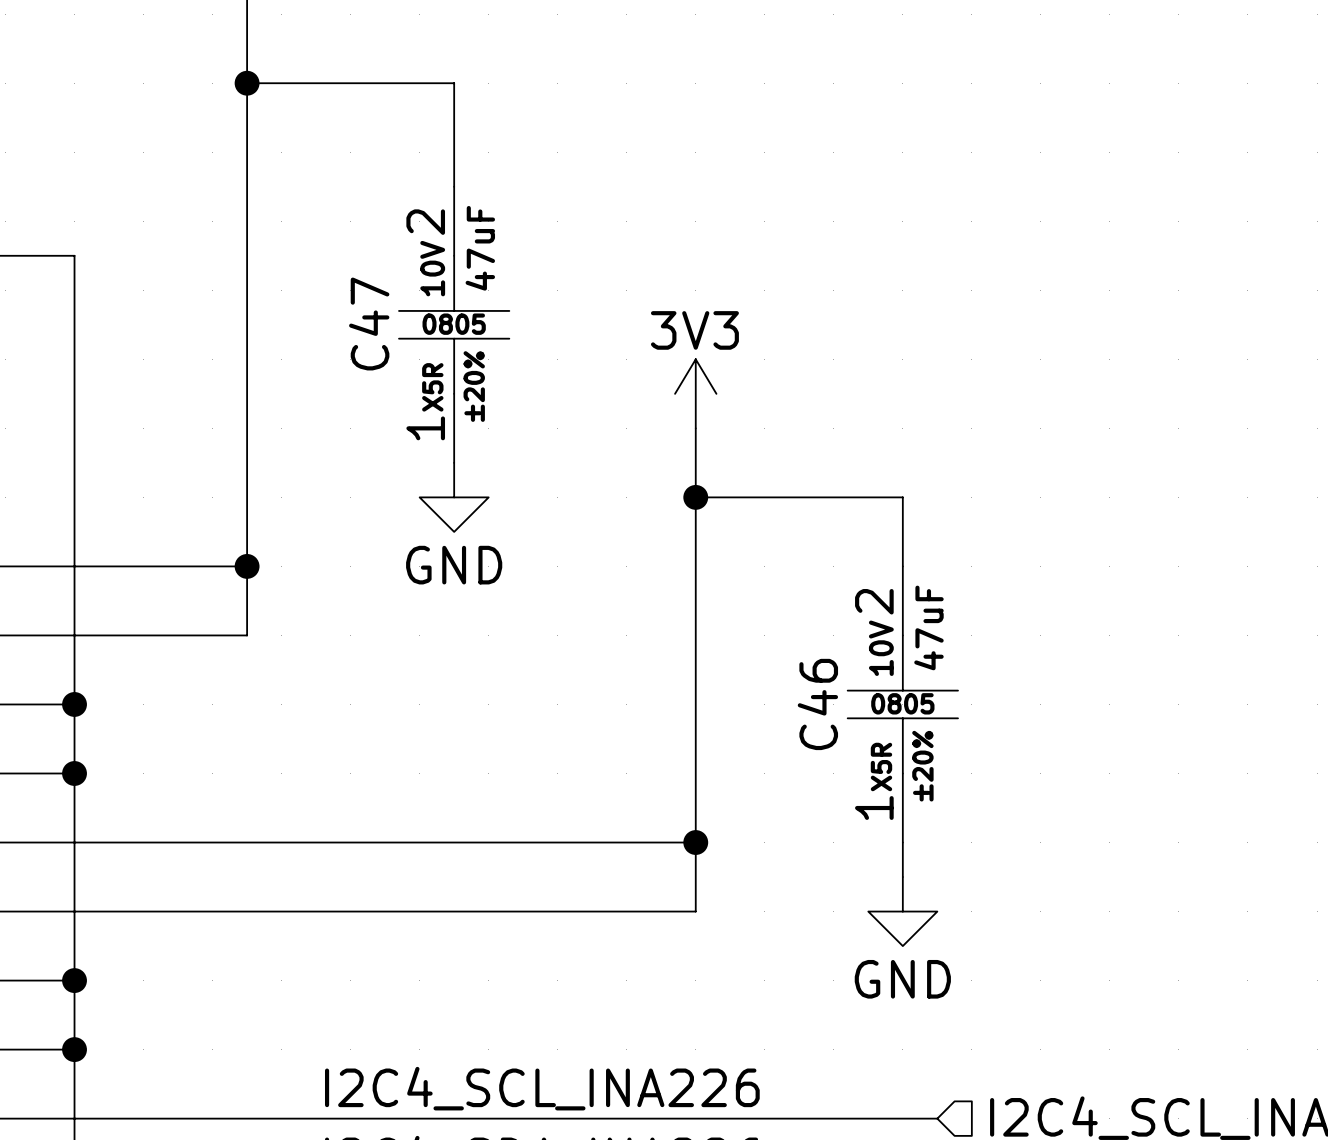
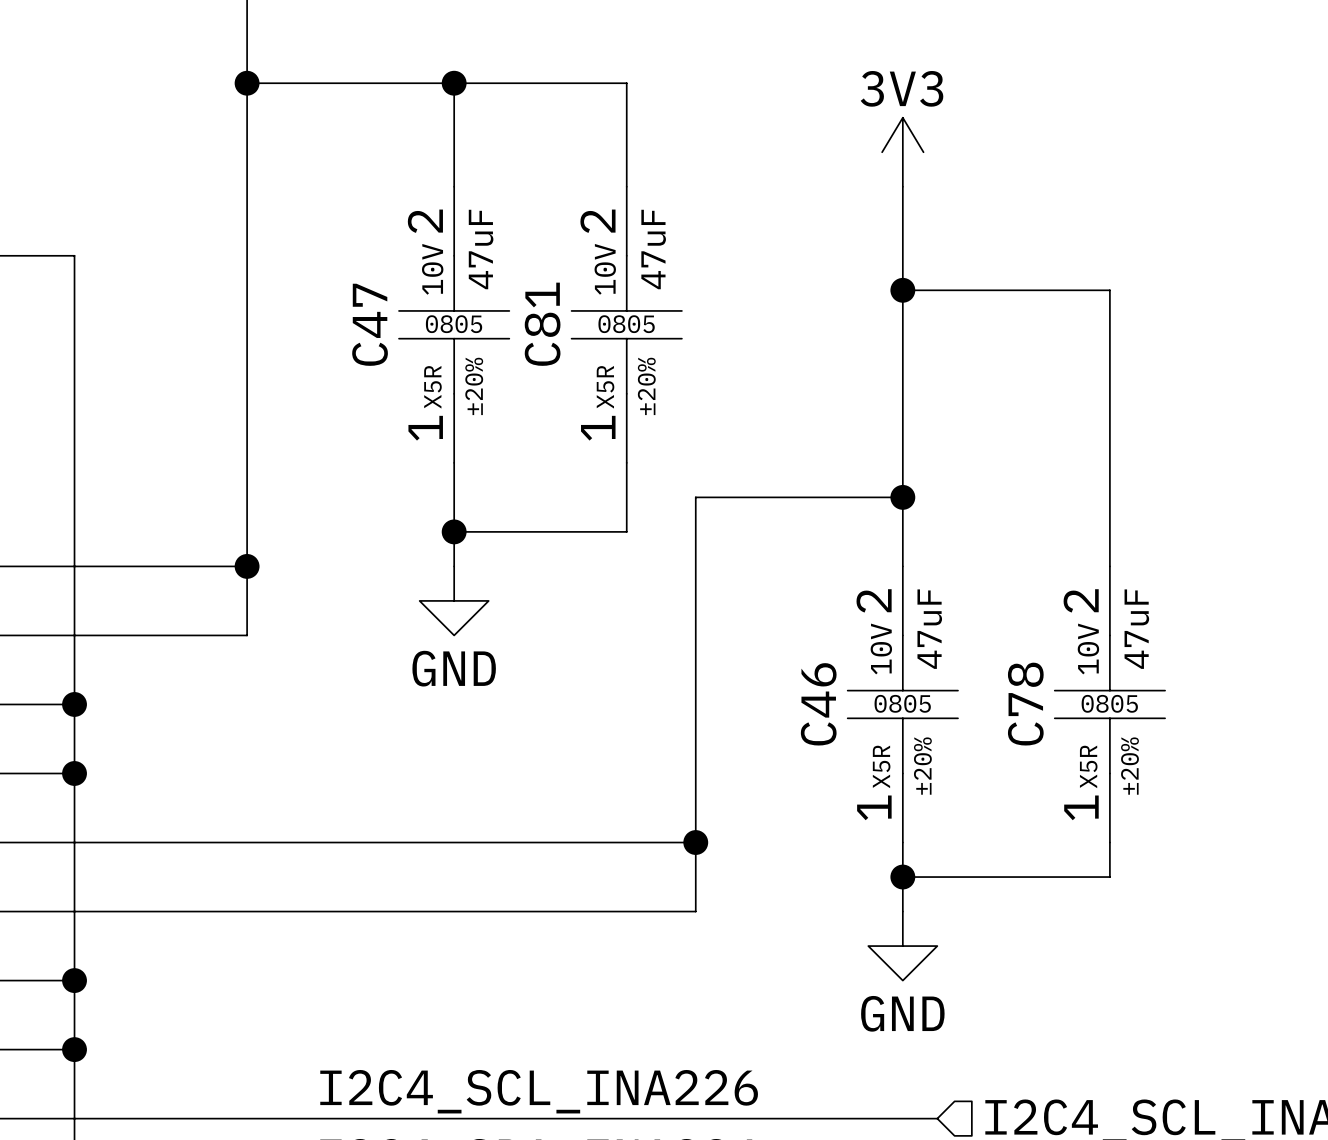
wire: none -> (454, 83) (626, 83) (626, 186)
junction: none -> (454, 83)
wire: none -> (902, 186) (902, 497)
wire: none -> (902, 290) (1109, 290) (1109, 566)
junction: none -> (902, 290)
C81: none -> (626, 324)
power symbol position: 3V3 (695, 393) -> 3V3 (902, 152)
wire: (695, 428) (695, 497) -> none
wire: none -> (454, 462) (454, 566)
wire: none -> (626, 462) (626, 531) (454, 531)
power symbol position: GND (454, 497) -> GND (454, 600)
junction: (695, 497) -> none
junction: none -> (902, 497)
junction: none -> (454, 531)
C78: none -> (1109, 704)
wire: none -> (1109, 842) (1109, 877) (902, 877) (902, 911)
junction: none -> (902, 877)
power symbol position: GND (902, 911) -> GND (902, 946)

